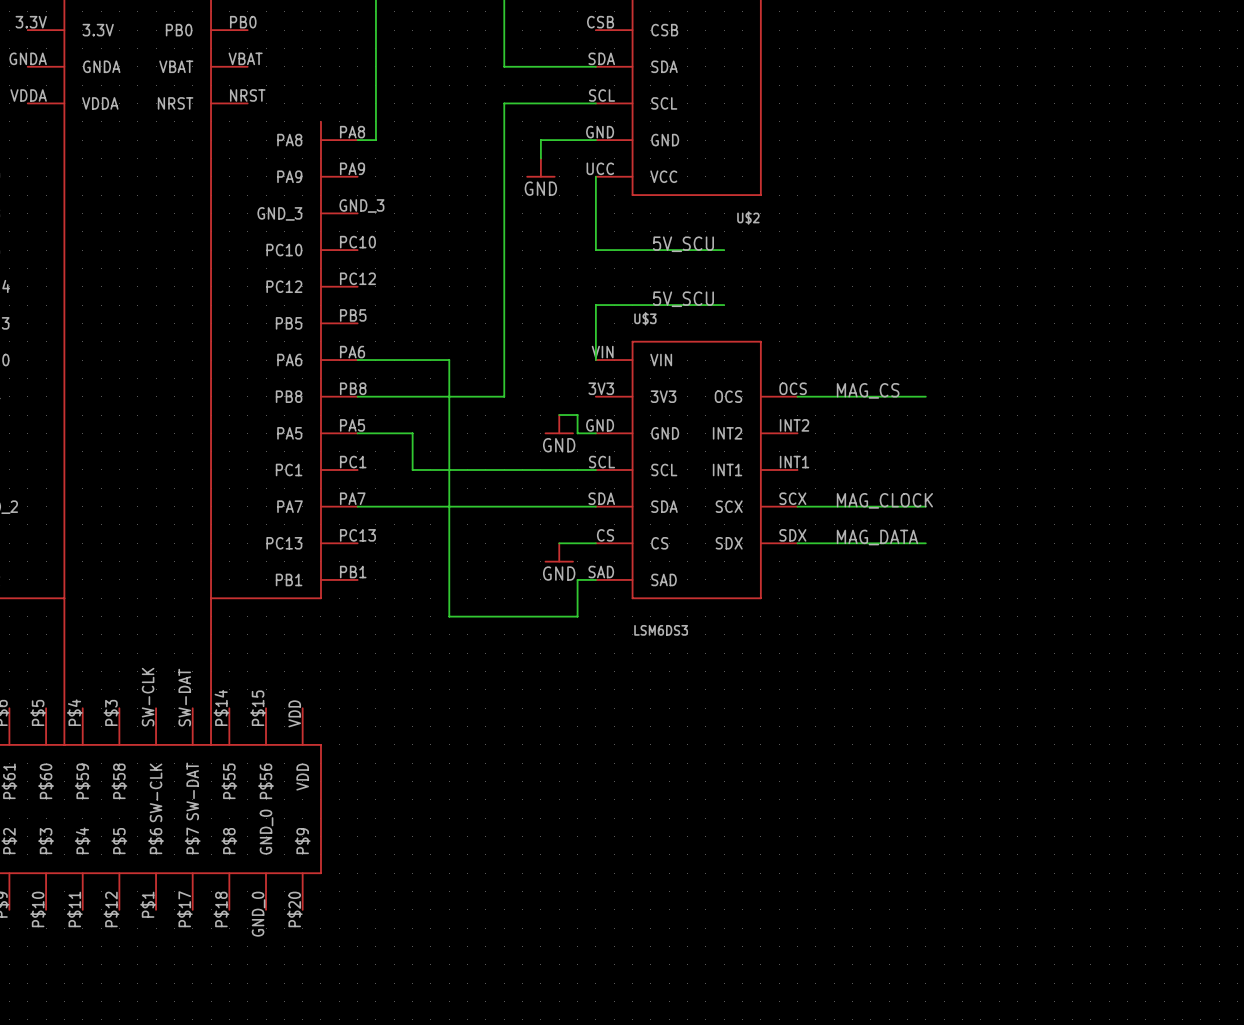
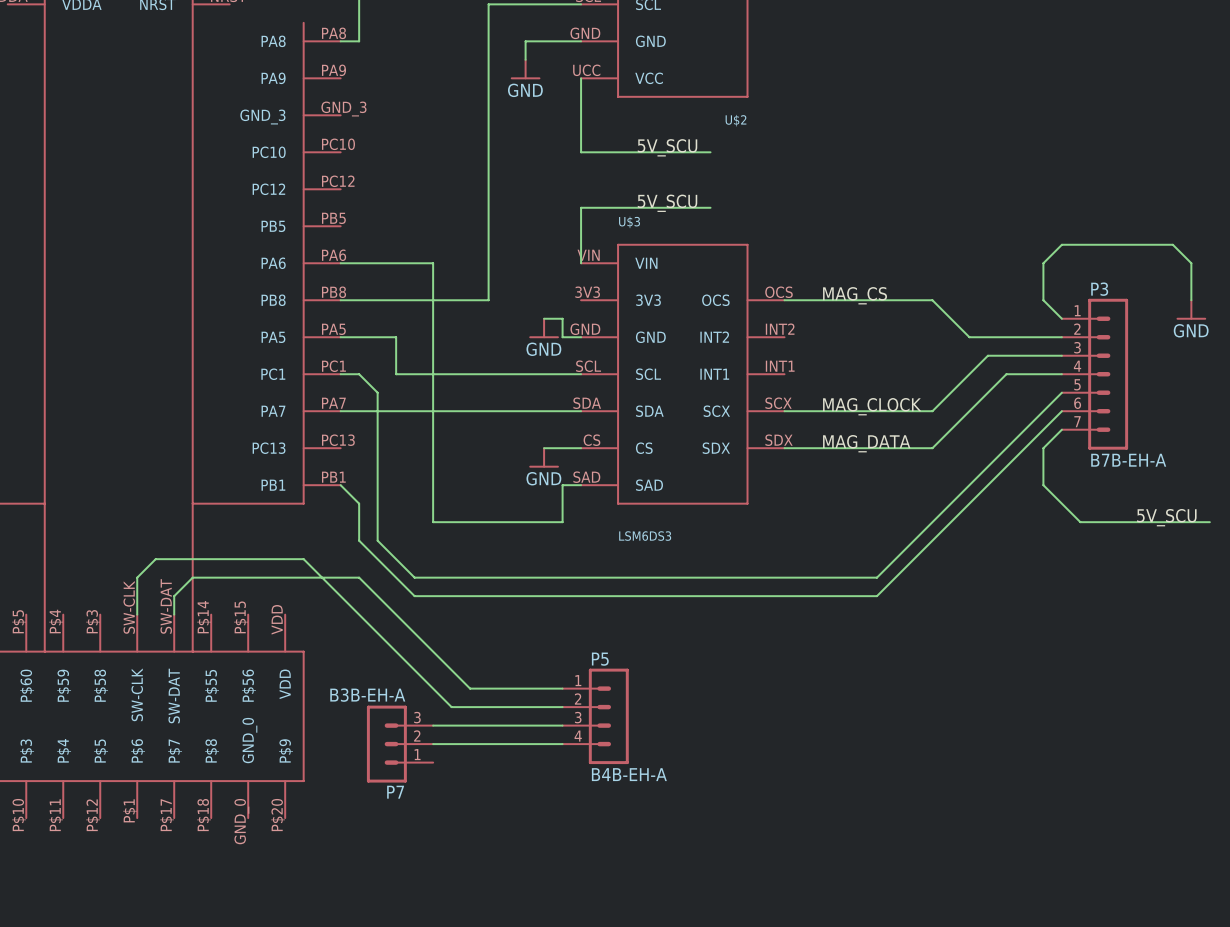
wire: none -> (913, 300) (932, 300) (969, 337) (1061, 337)
wire: none -> (1191, 300) (1191, 263) (1172, 244) (1061, 244) (1043, 263) (1043, 300) (1061, 318)
power symbol: none -> GND (1191, 309)
wire: none -> (1061, 355) (987, 355) (932, 411) (913, 411)
wire: none -> (340, 374) (359, 374) (377, 392) (377, 540) (414, 577) (876, 577) (1061, 392)
wire: none -> (1061, 374) (1006, 374) (932, 448) (913, 448)
P3: none -> B7B-EH-A (1095, 374)
wire: none -> (1061, 411) (876, 596) (414, 596) (359, 540) (359, 503) (340, 485)
wire: none -> (1061, 429) (1043, 448) (1043, 485) (1080, 522) (1209, 522)
label: none -> 5V_SCU (1166, 517)
wire: none -> (137, 614) (137, 577) (155, 559) (303, 559) (451, 707) (562, 707)
wire: none -> (174, 614) (174, 596) (192, 577) (359, 577) (470, 688) (562, 688)
P5: none -> B4B-EH-A (595, 716)
wire: none -> (433, 725) (562, 725)
P7: none -> B3B-EH-A (400, 744)
wire: none -> (433, 744) (562, 744)

